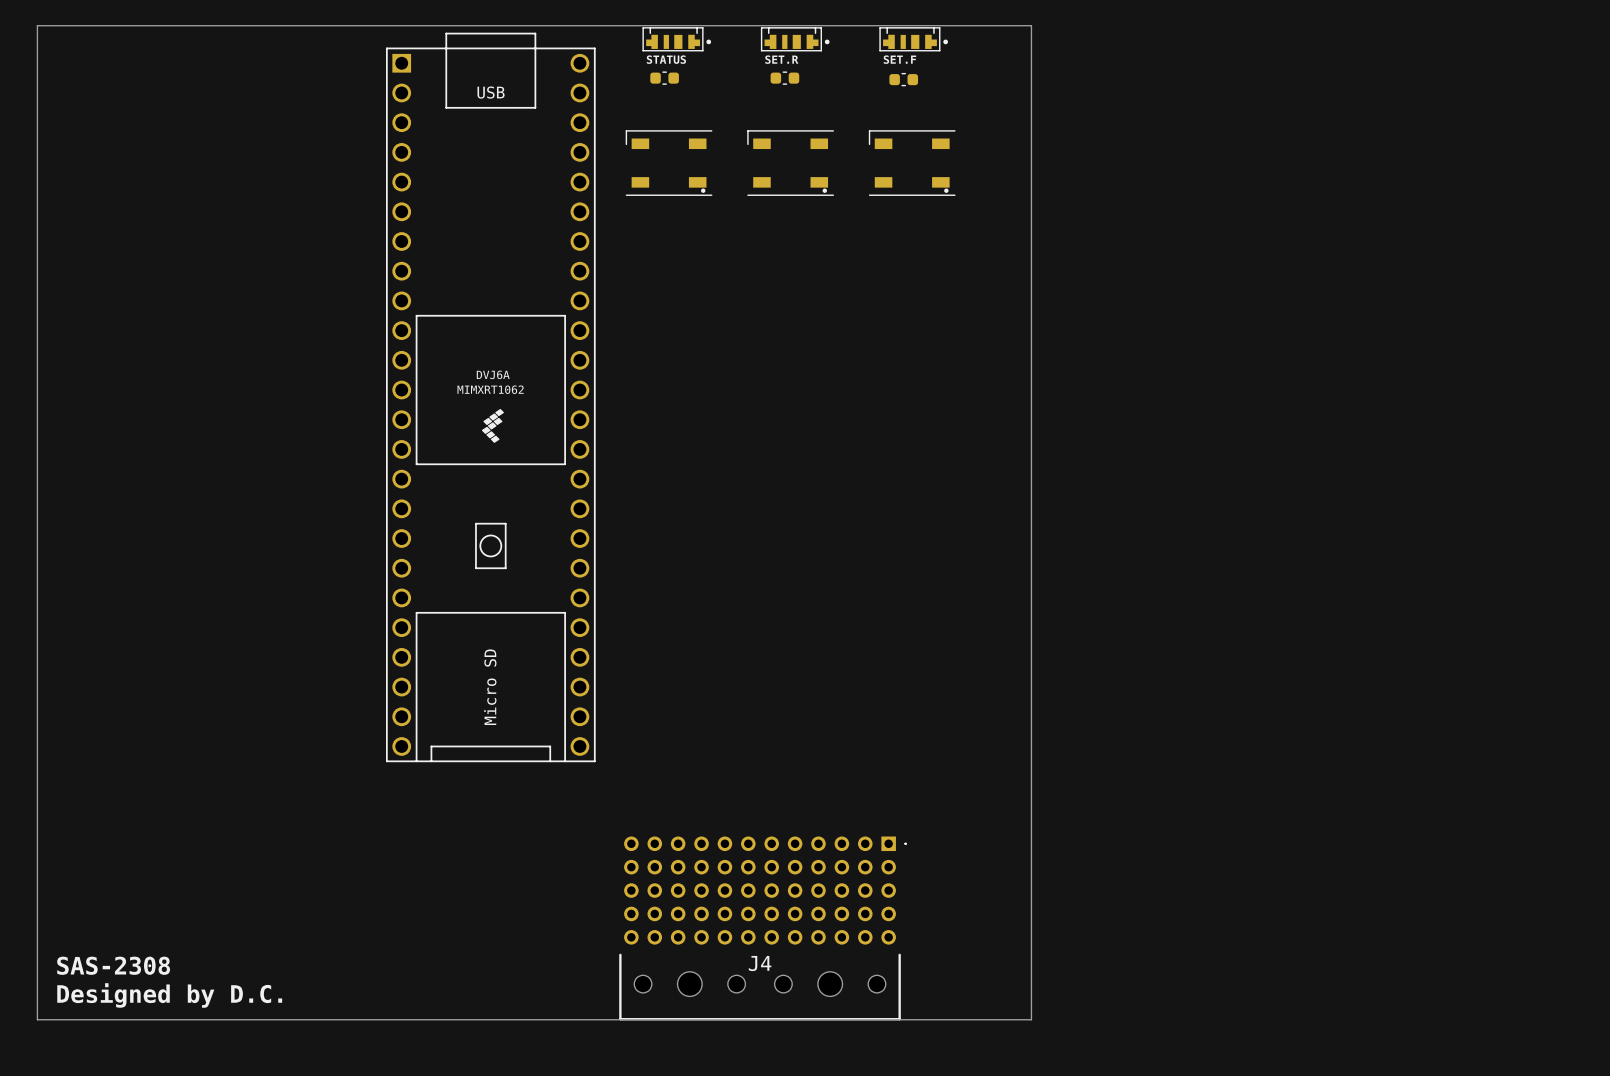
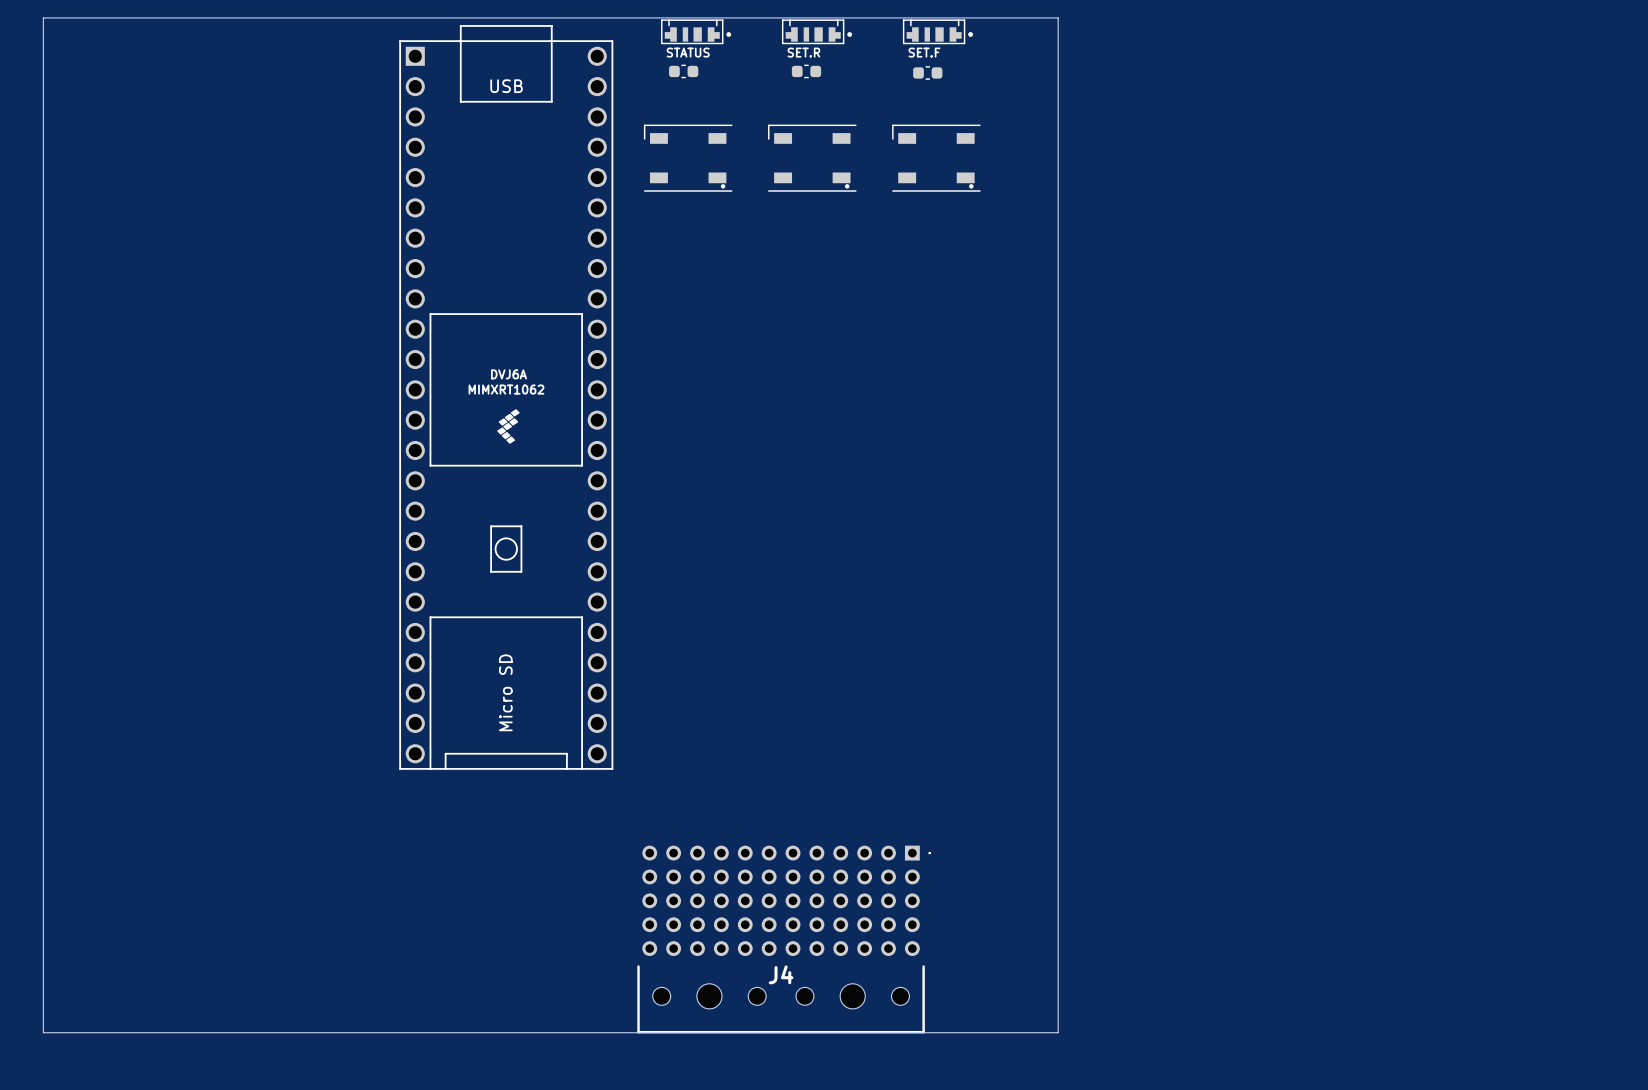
text: SAS-2308 (113, 965) -> none
text: Designed by D.C. (169, 995) -> none

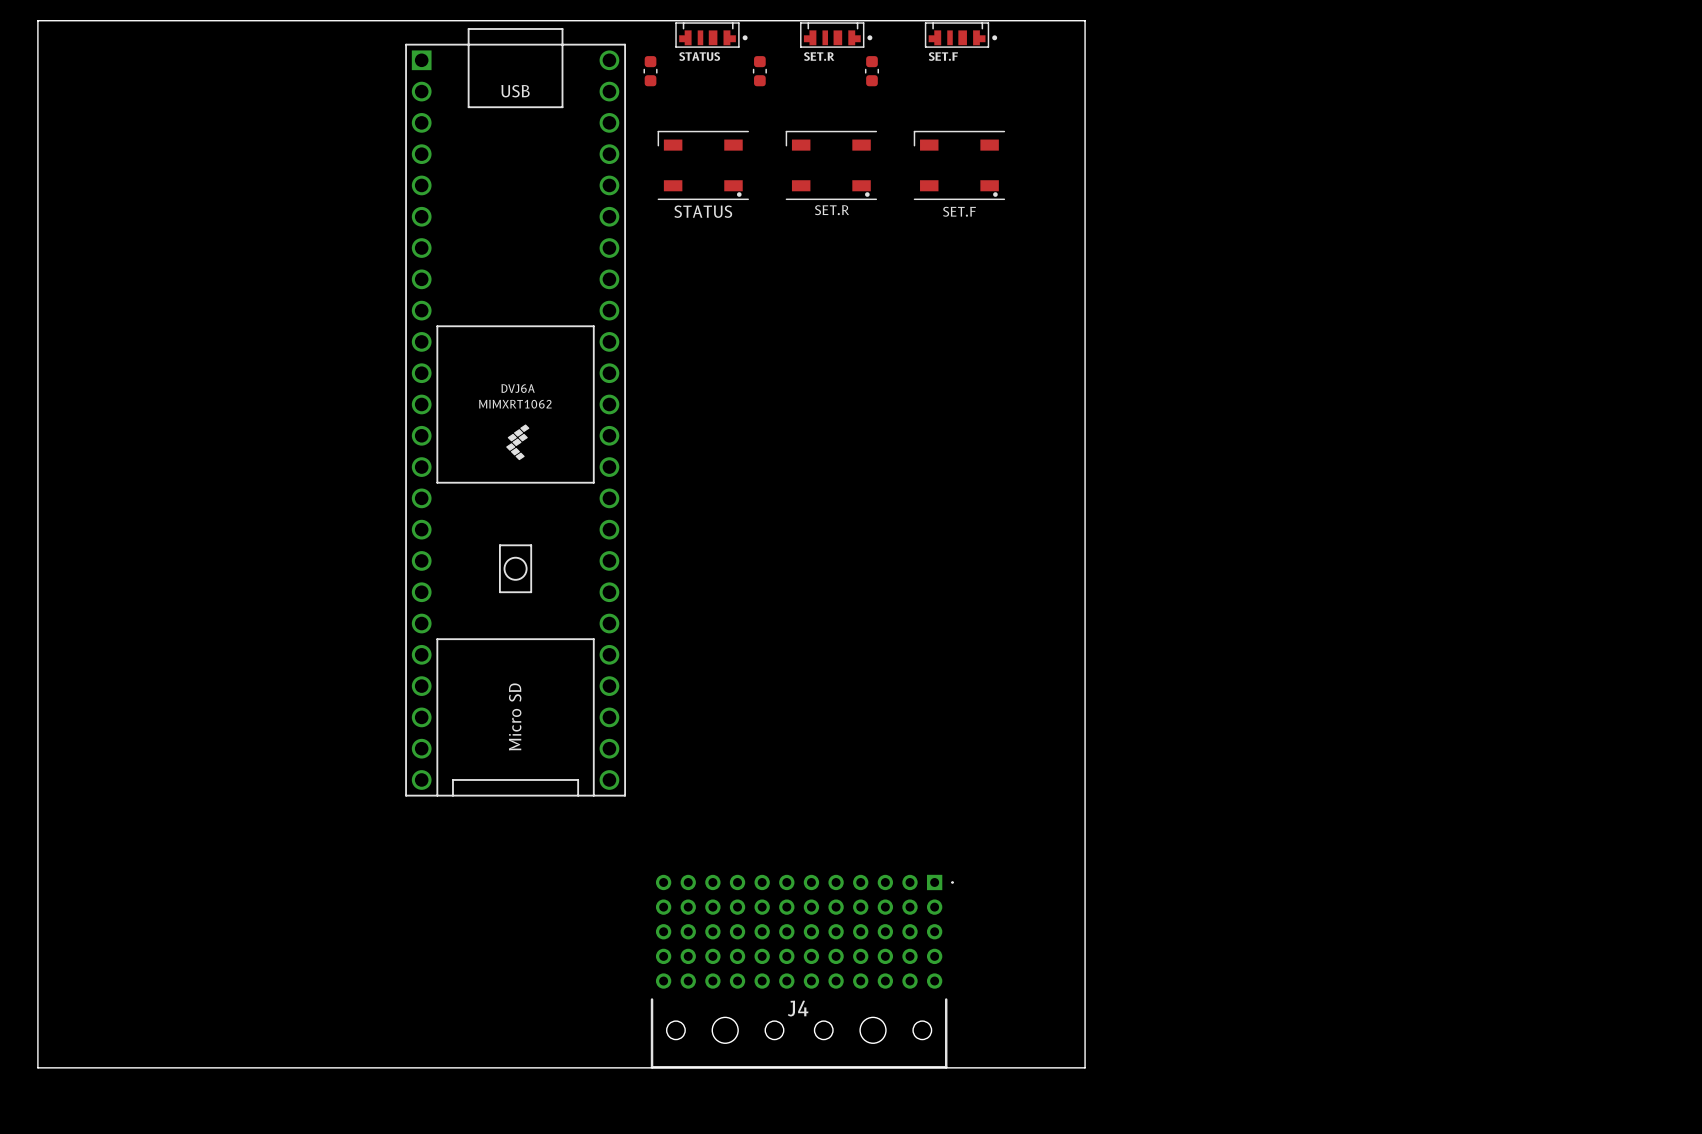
part: none -> (650, 71)
part: none -> (759, 71)
part: none -> (871, 71)
part: (683, 71) -> none
part: (806, 71) -> none
part: (927, 72) -> none
part value: none -> SET.R (832, 210)
part value: none -> STATUS (703, 211)
part value: none -> SET.F (959, 211)

